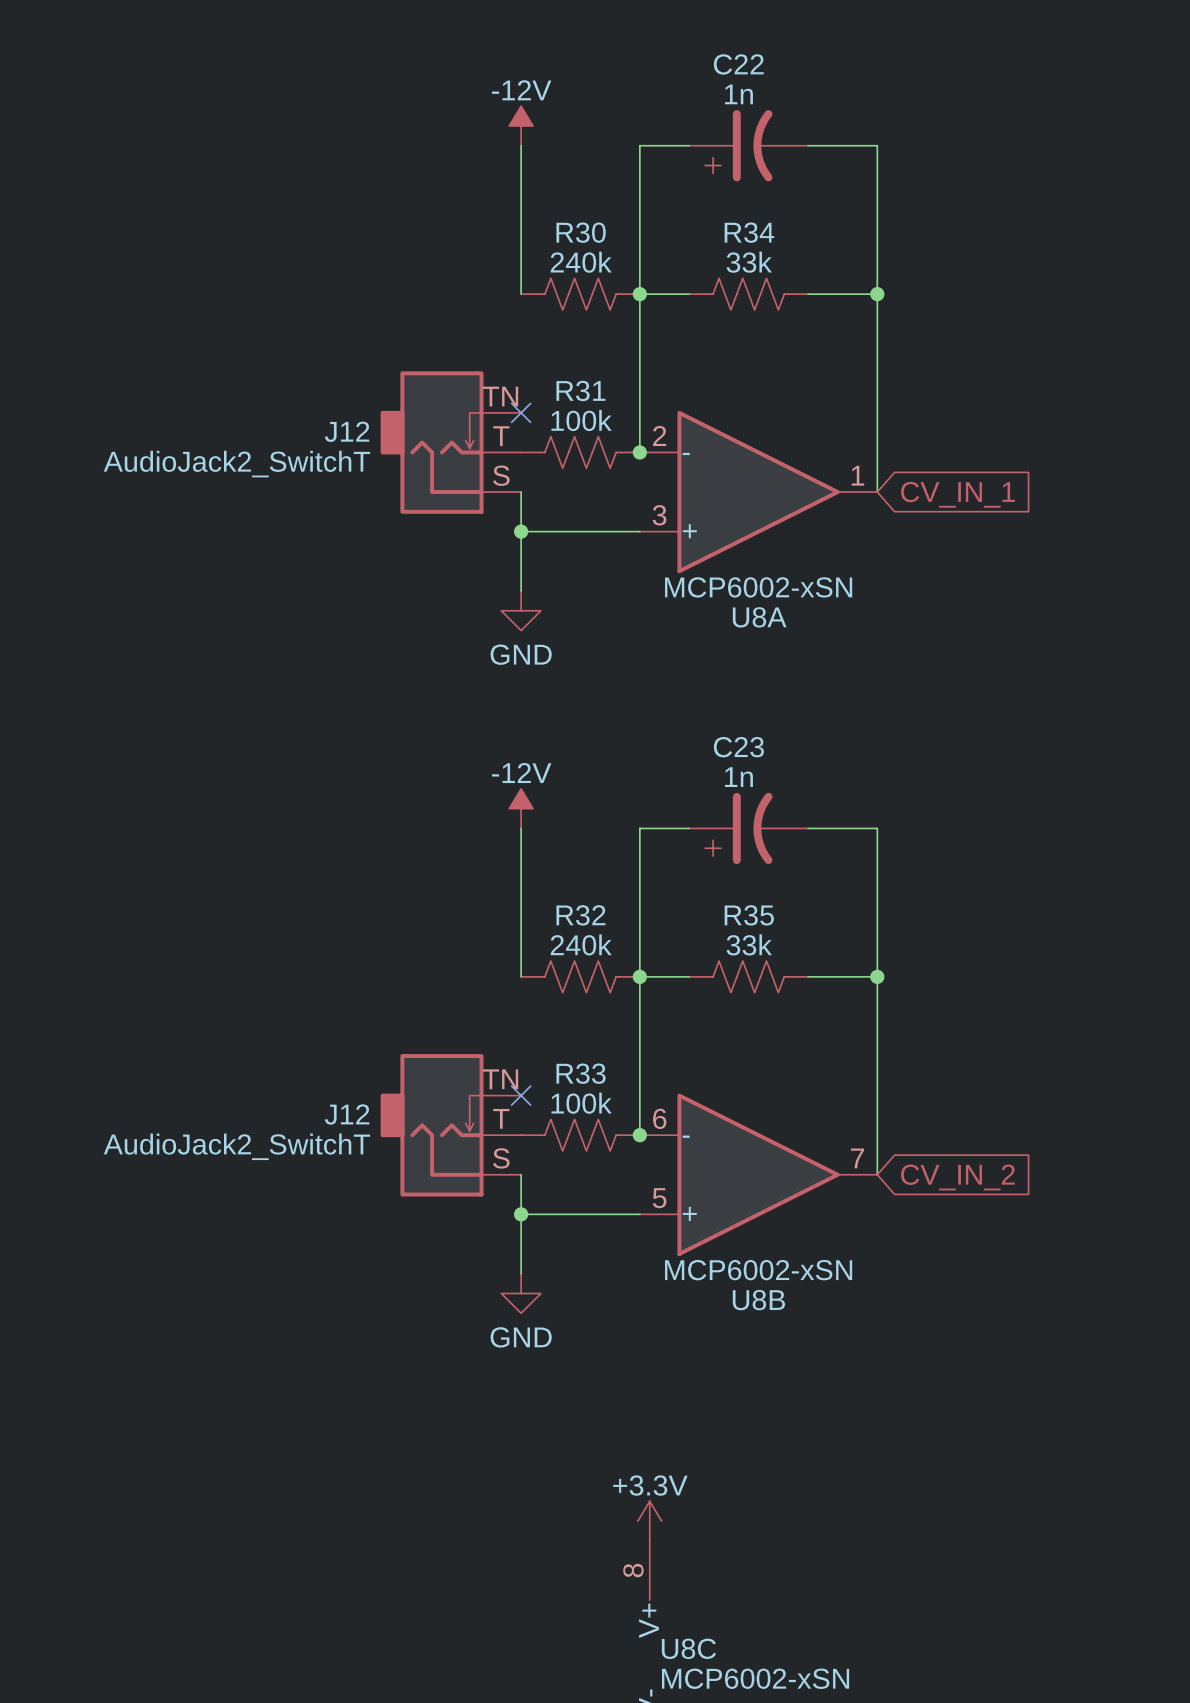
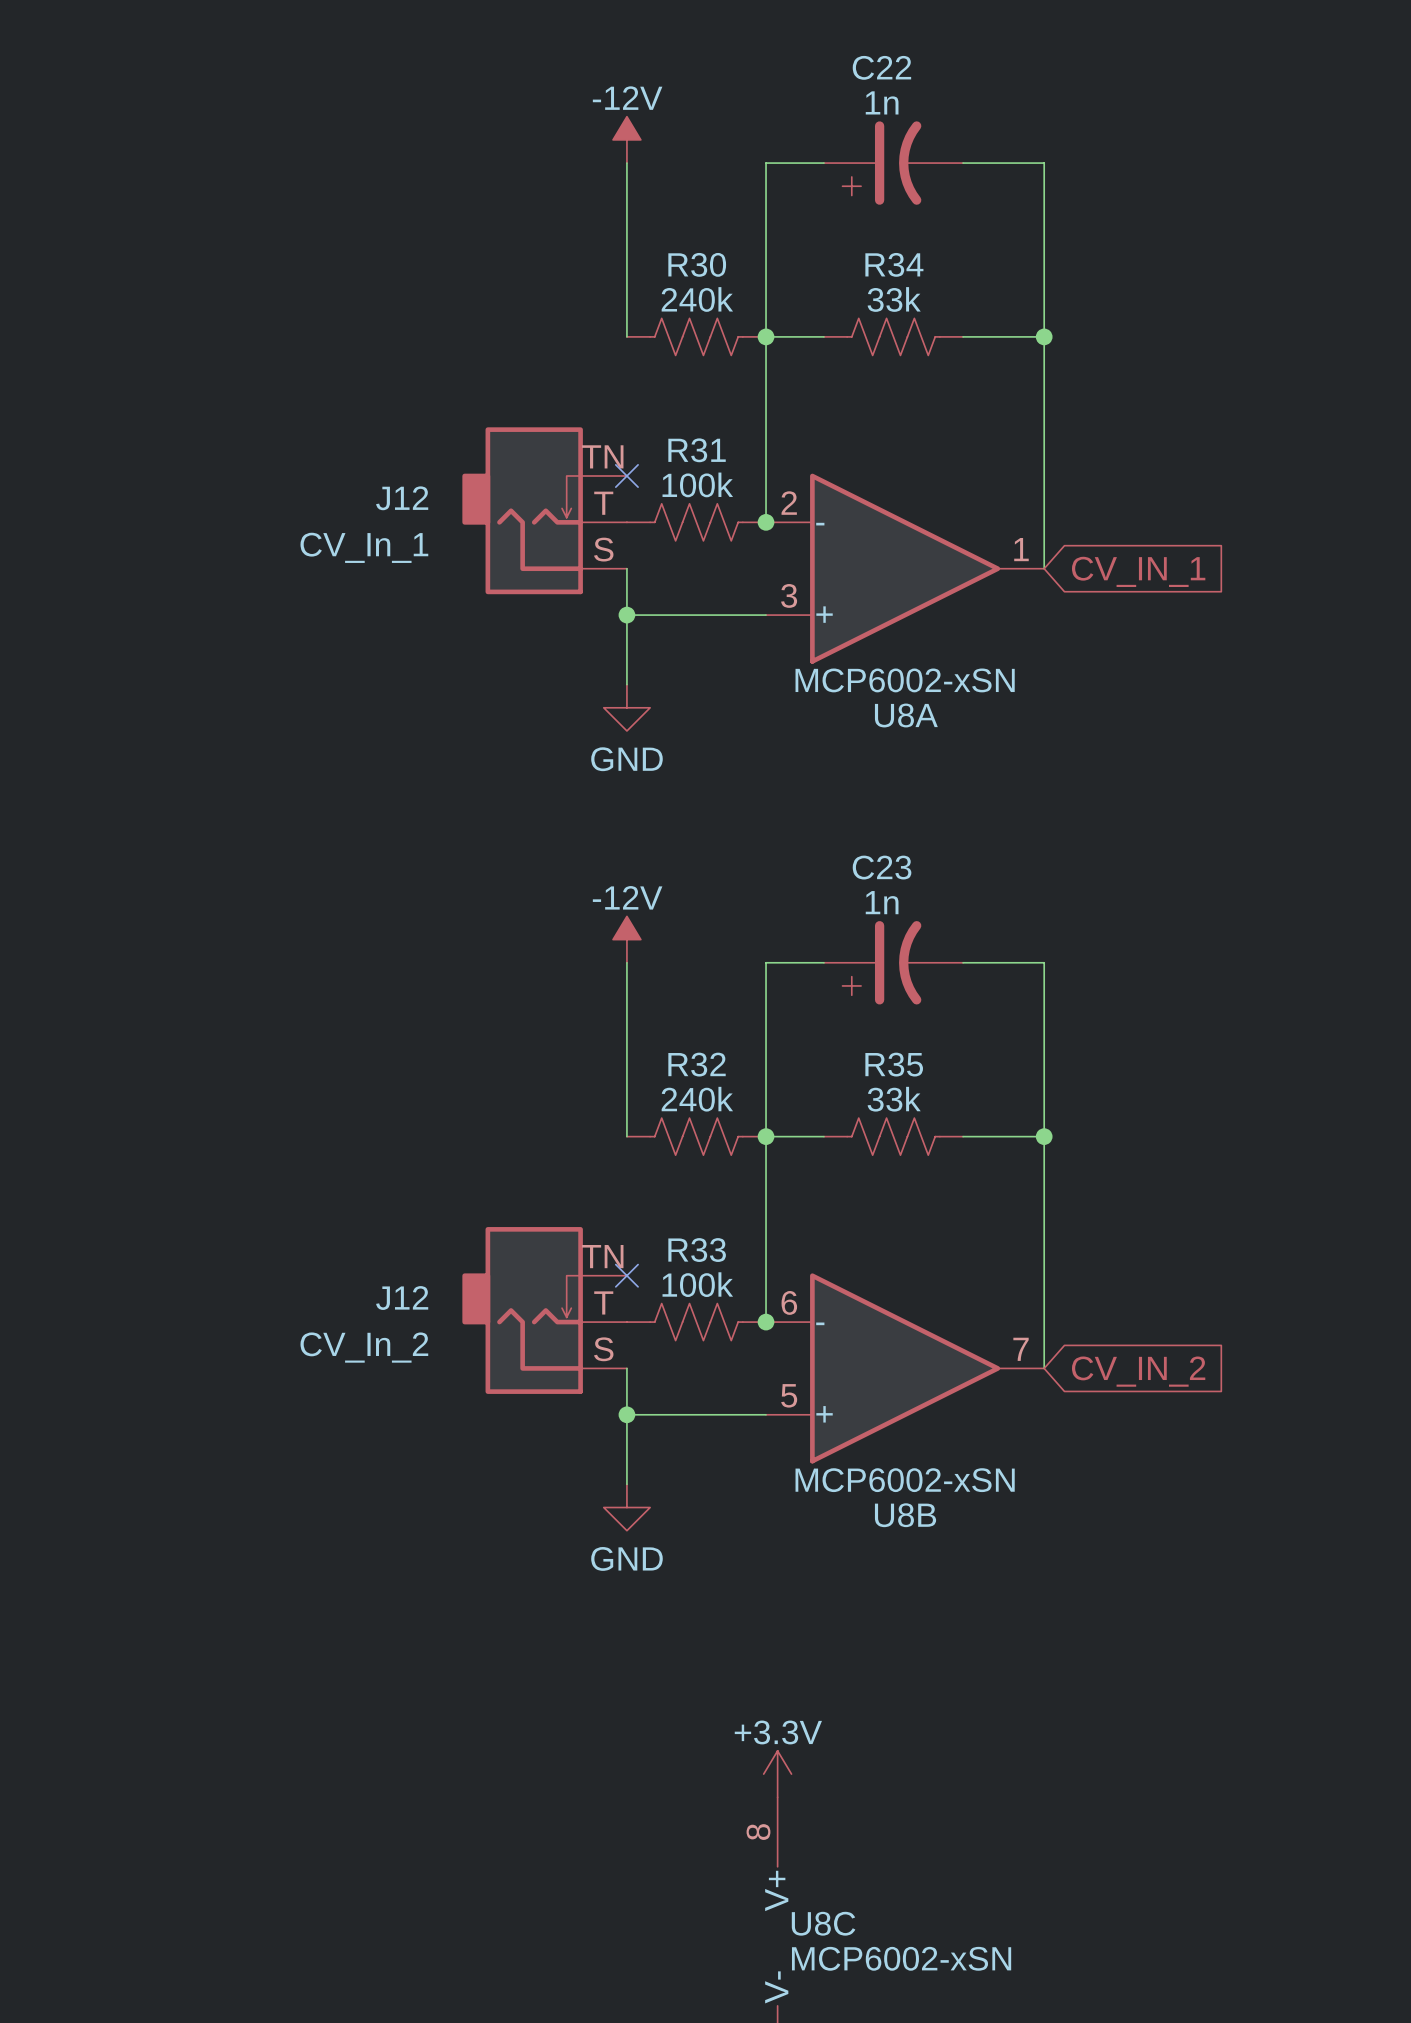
J12 name position: J12 (347, 431) -> J12 (402, 498)
J12 value: AudioJack2_SwitchT (236, 464) -> CV_In_1 (364, 547)
J12 name position: J12 (347, 1114) -> J12 (402, 1298)
J12 value: AudioJack2_SwitchT (236, 1146) -> CV_In_2 (364, 1347)

